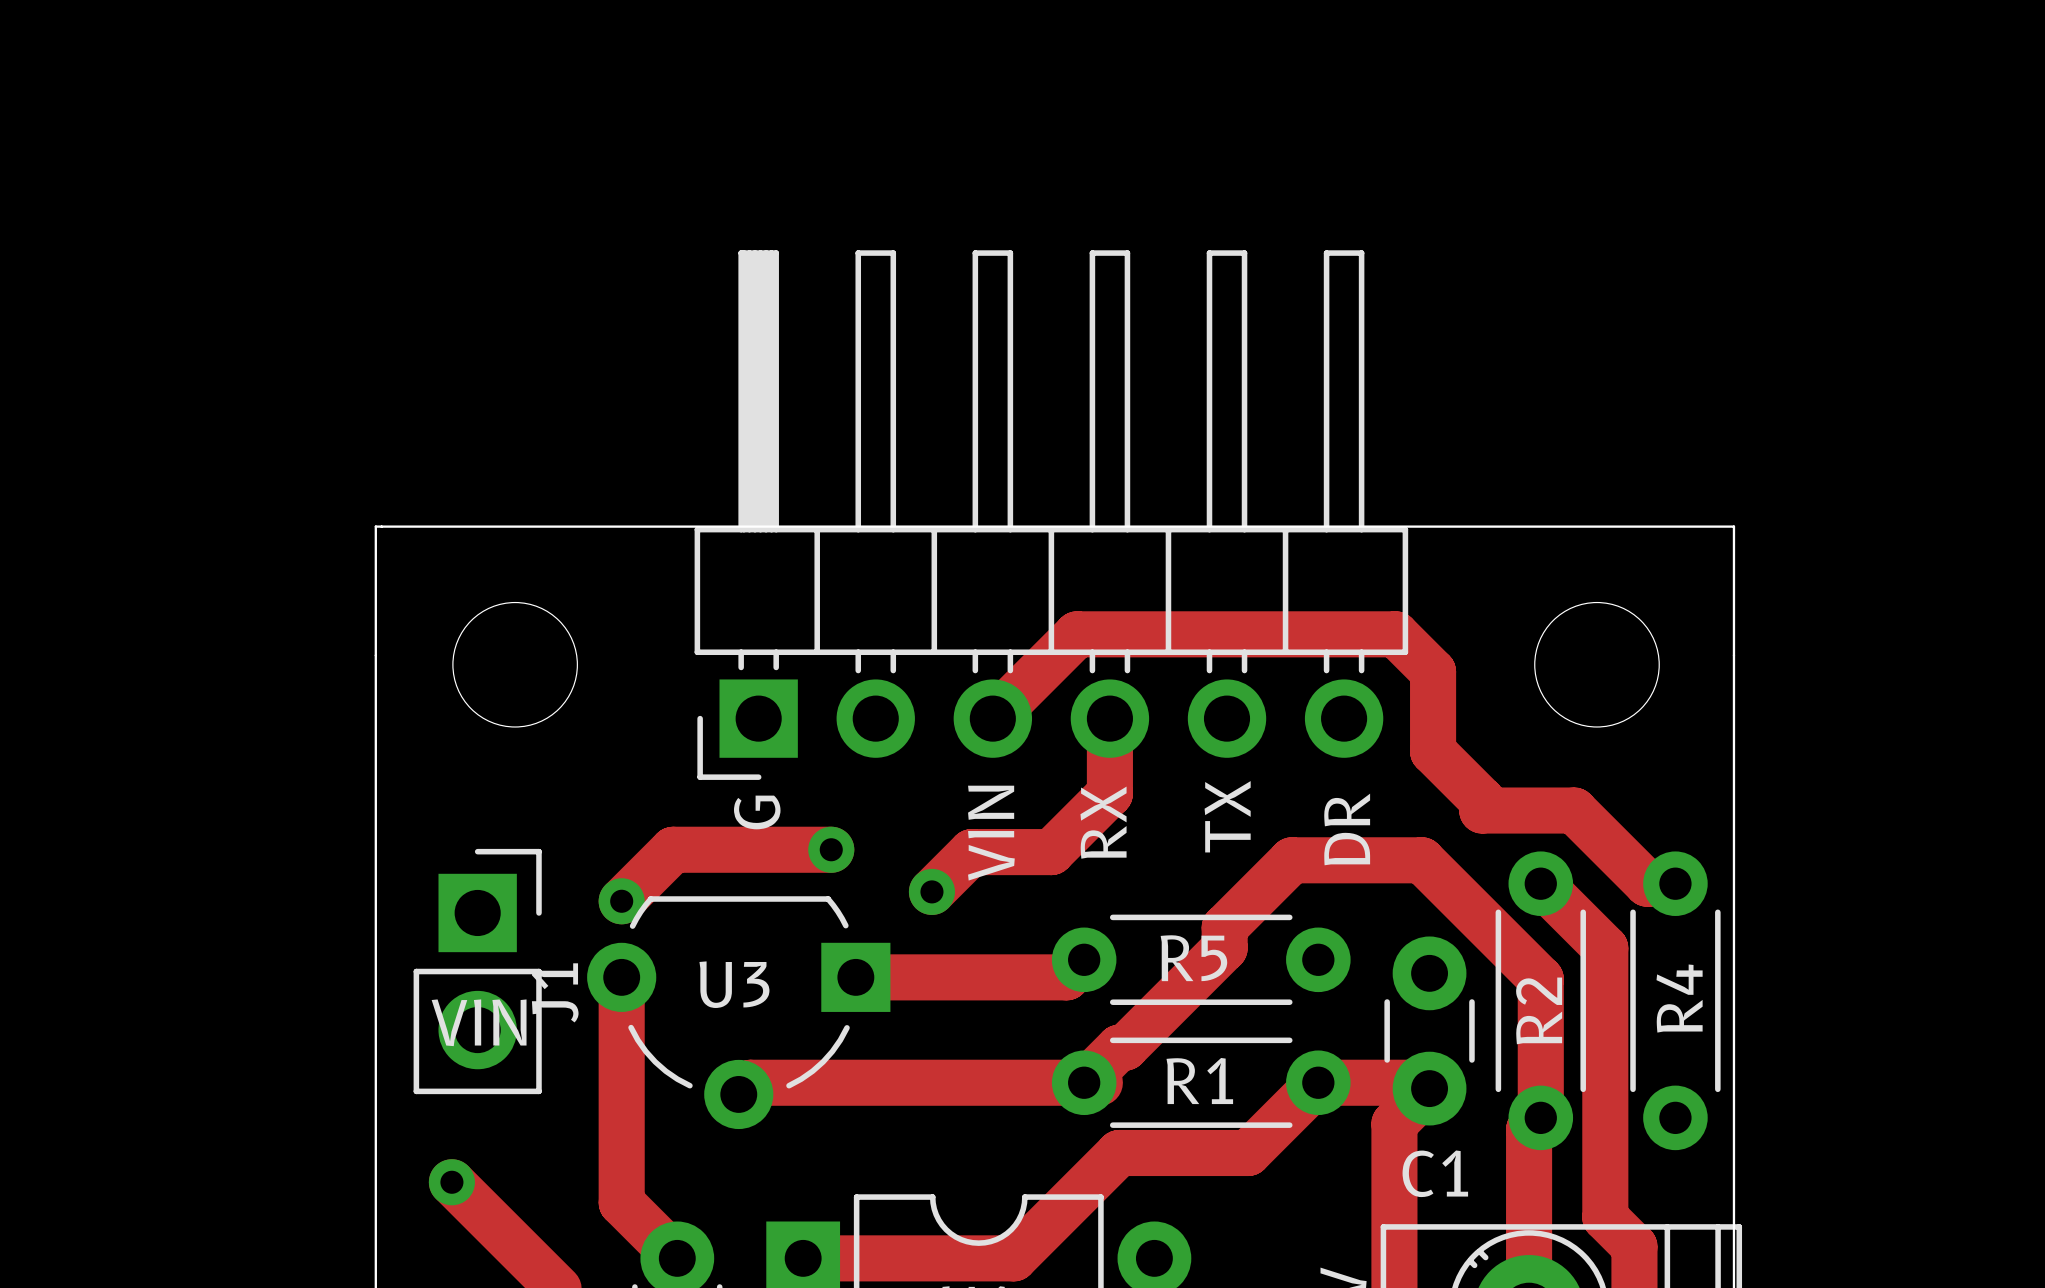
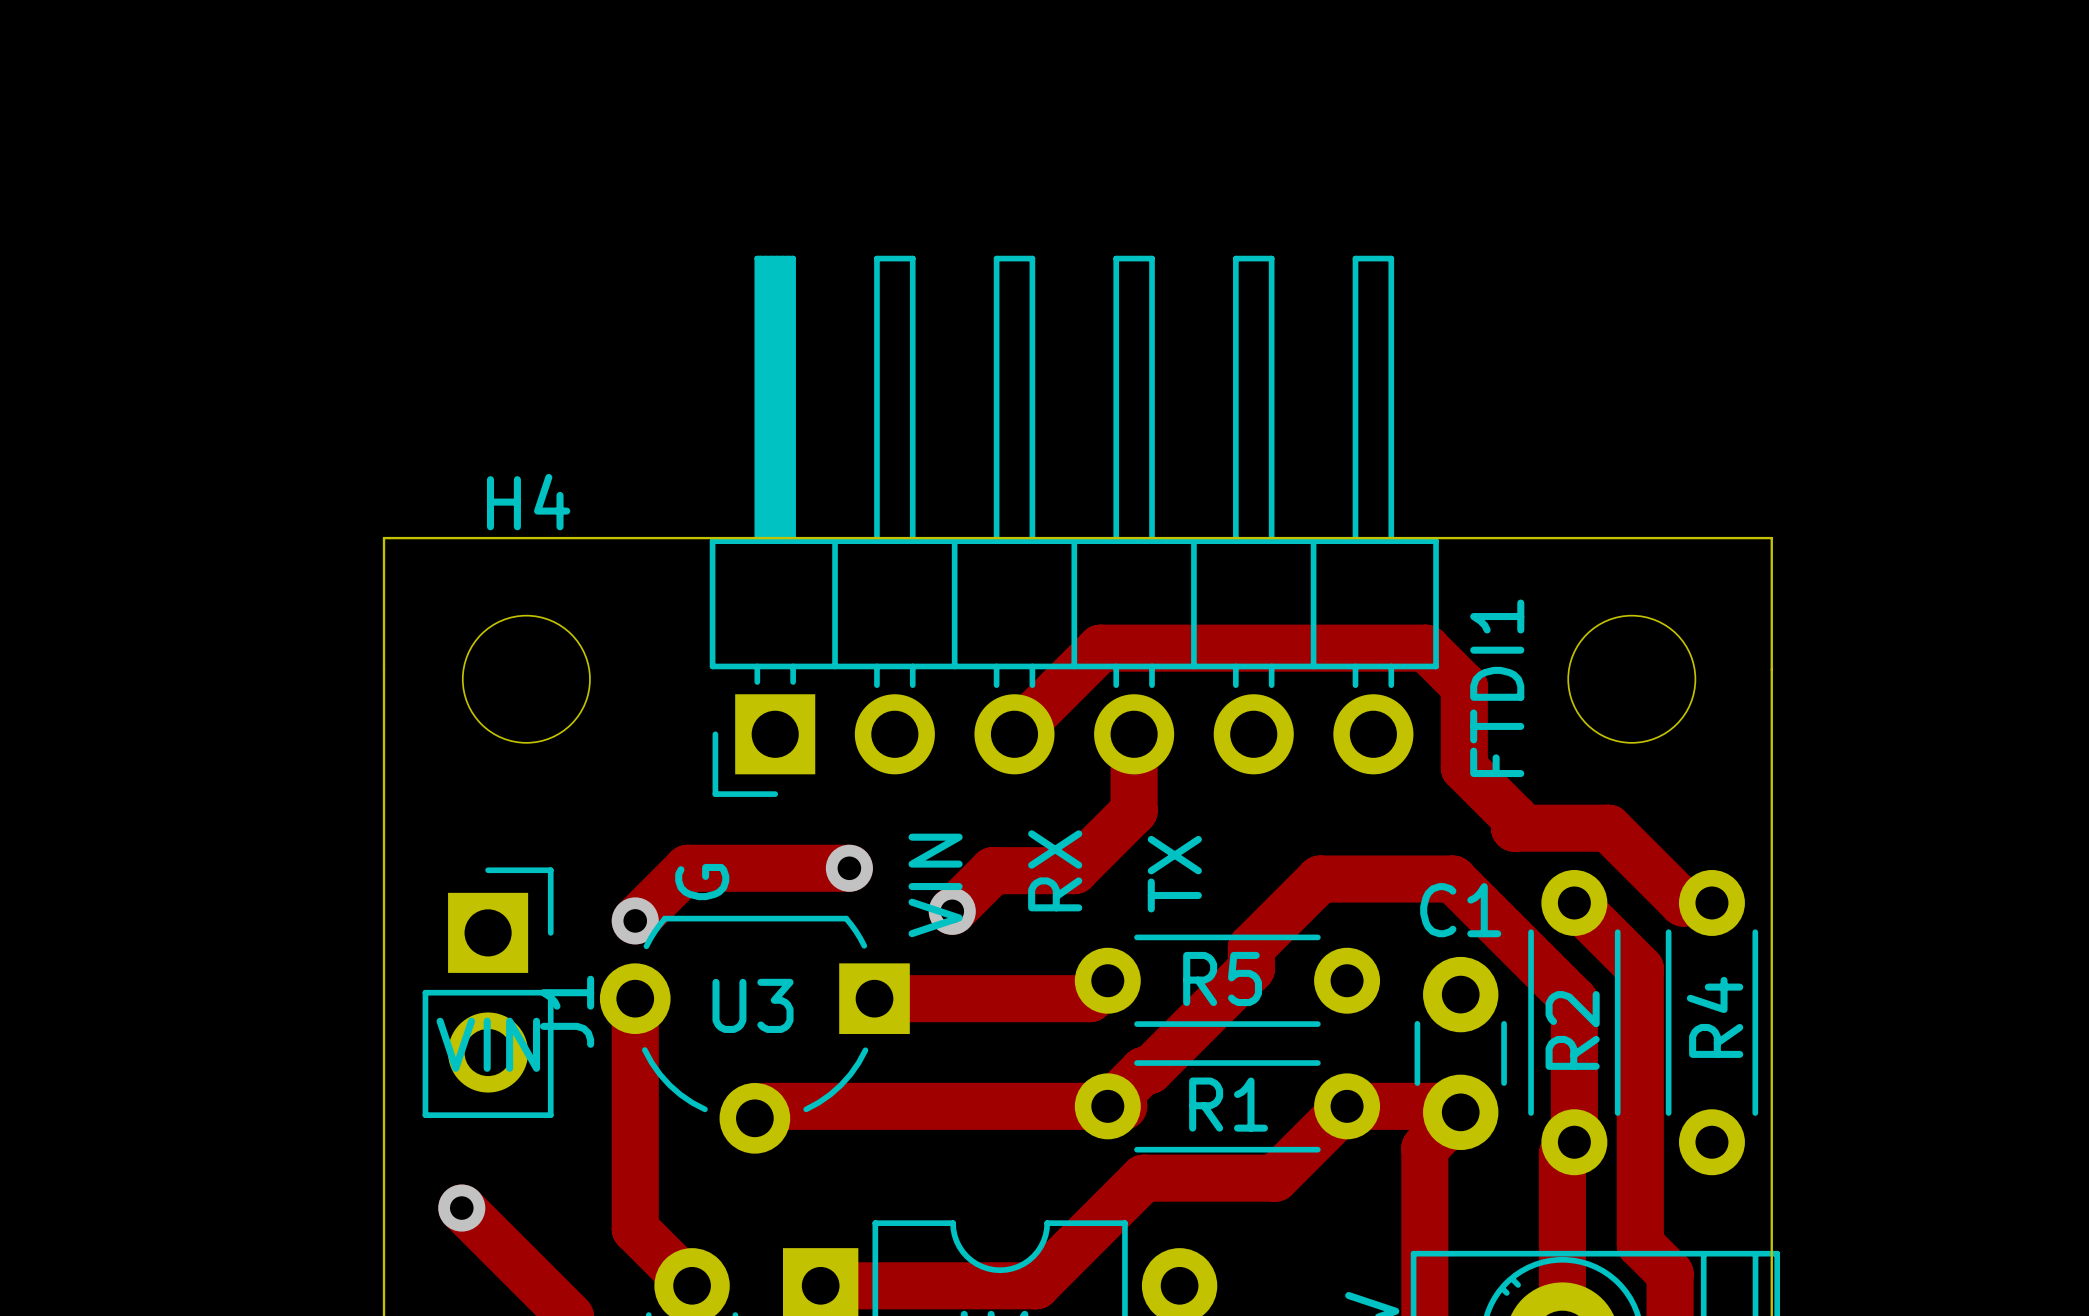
H4 name: none -> H4 (528, 502)
FTDI1 name: none -> FTDI1 (1497, 688)
text position: G (757, 812) -> G (702, 882)
text position: TX (1227, 816) -> TX (1174, 874)
text position: RX (1103, 822) -> RX (1055, 870)
text: DR (1347, 829) -> none
text position: VIN (991, 833) -> VIN (935, 885)
C1 name position: C1 (1435, 1173) -> C1 (1460, 910)

